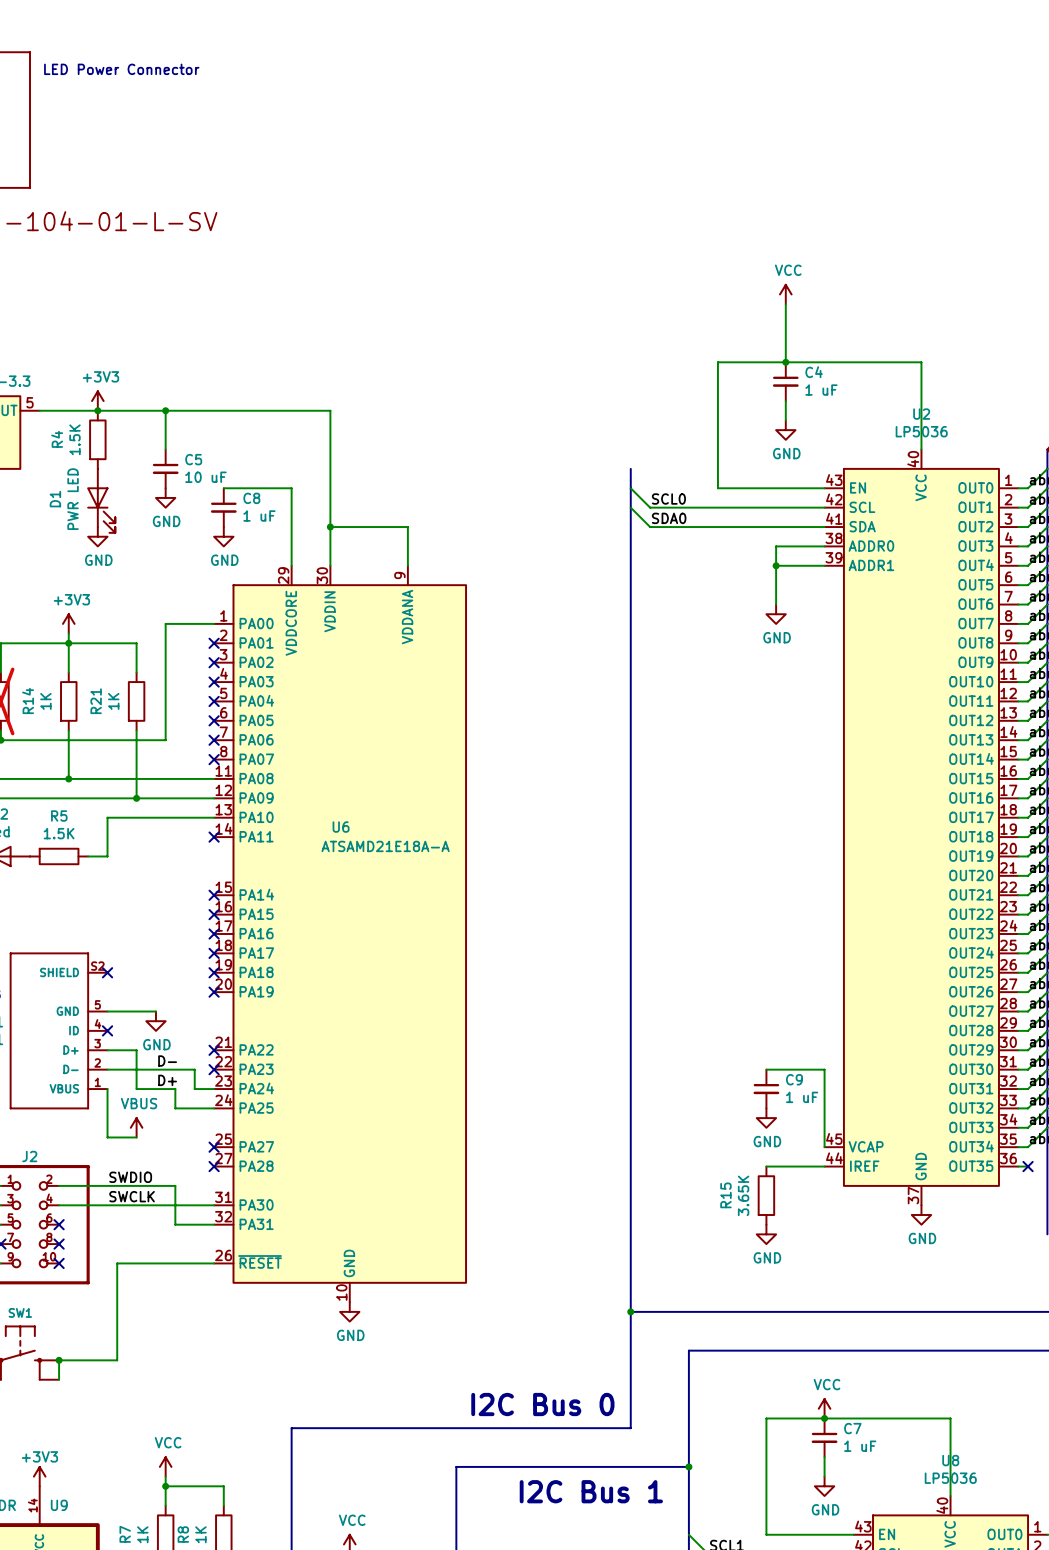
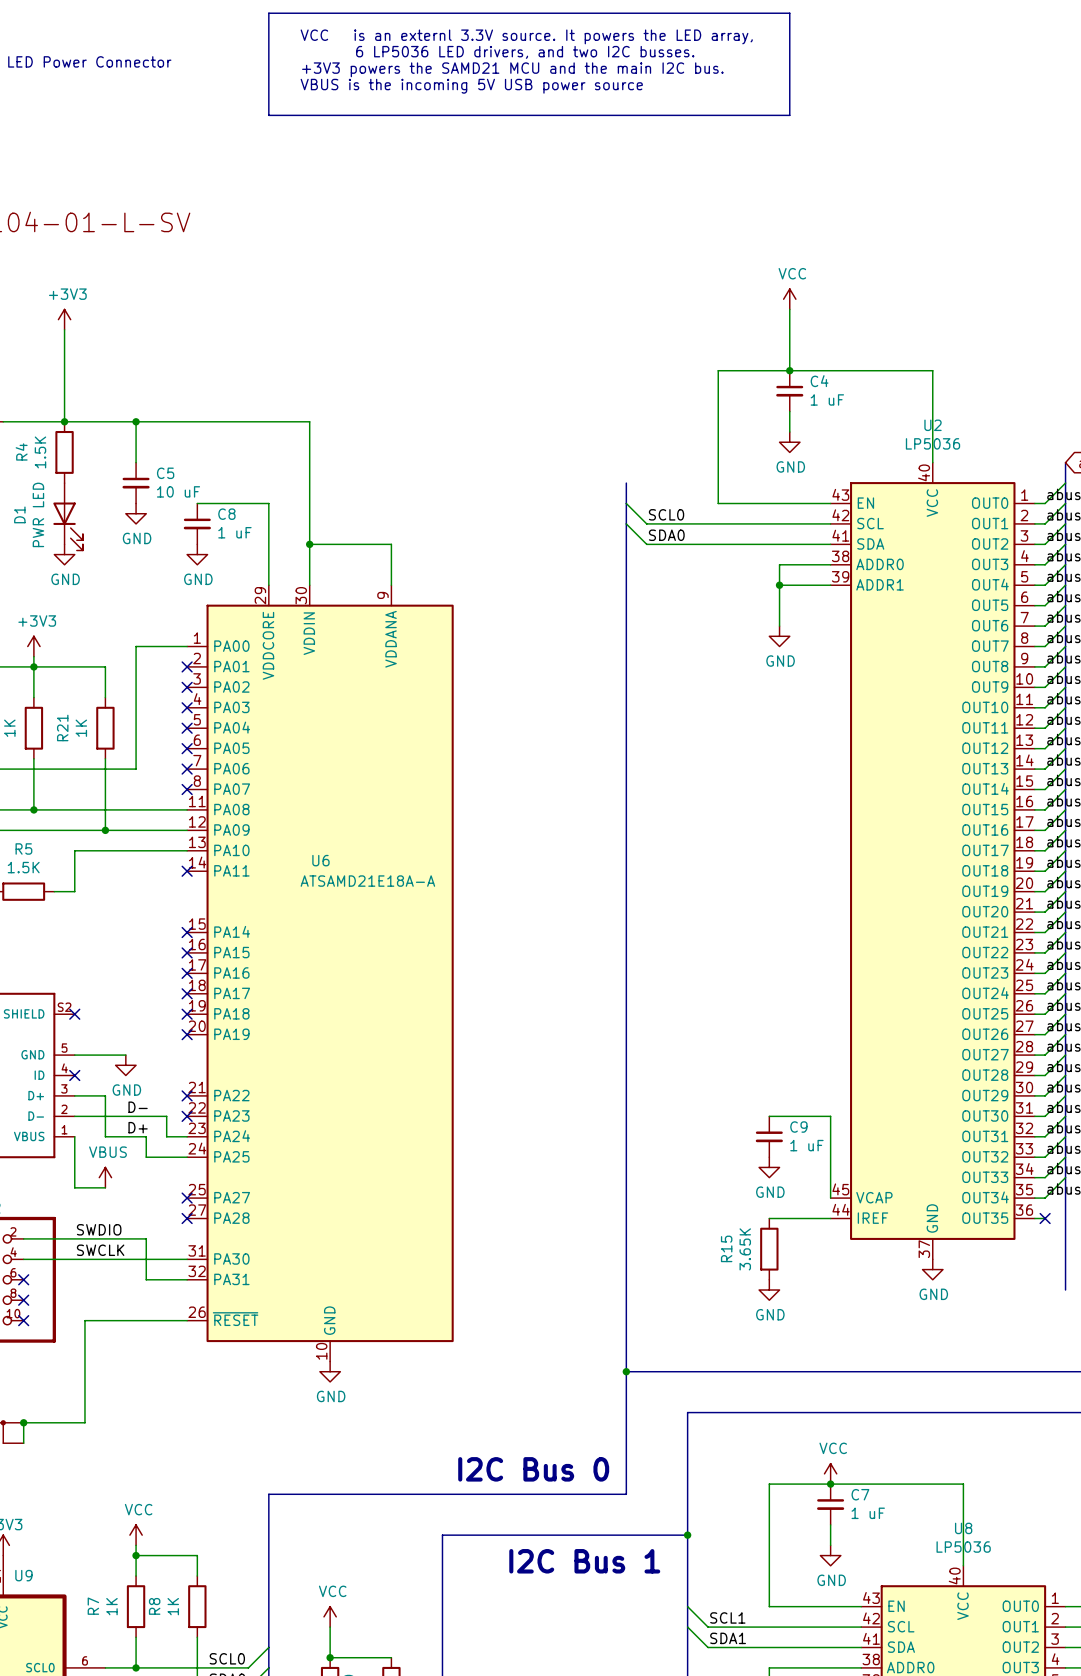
line: none -> (268, 13) (789, 13) (789, 115) (268, 115) (268, 13)
text: none -> VCC is an externl 3.3V source. It powers the LED array, (526, 36)
text: none -> 6 LP5036 LED drivers, and two I2C busses. (525, 52)
text: none -> +3V3 powers the SAMD21 MCU and the main I2C bus. (512, 69)
text: none -> VBUS is the incoming 5V USB power source (471, 86)
wire: none -> (64, 329) (64, 421)
power symbol position: +3V3 (97, 401) -> +3V3 (64, 319)

